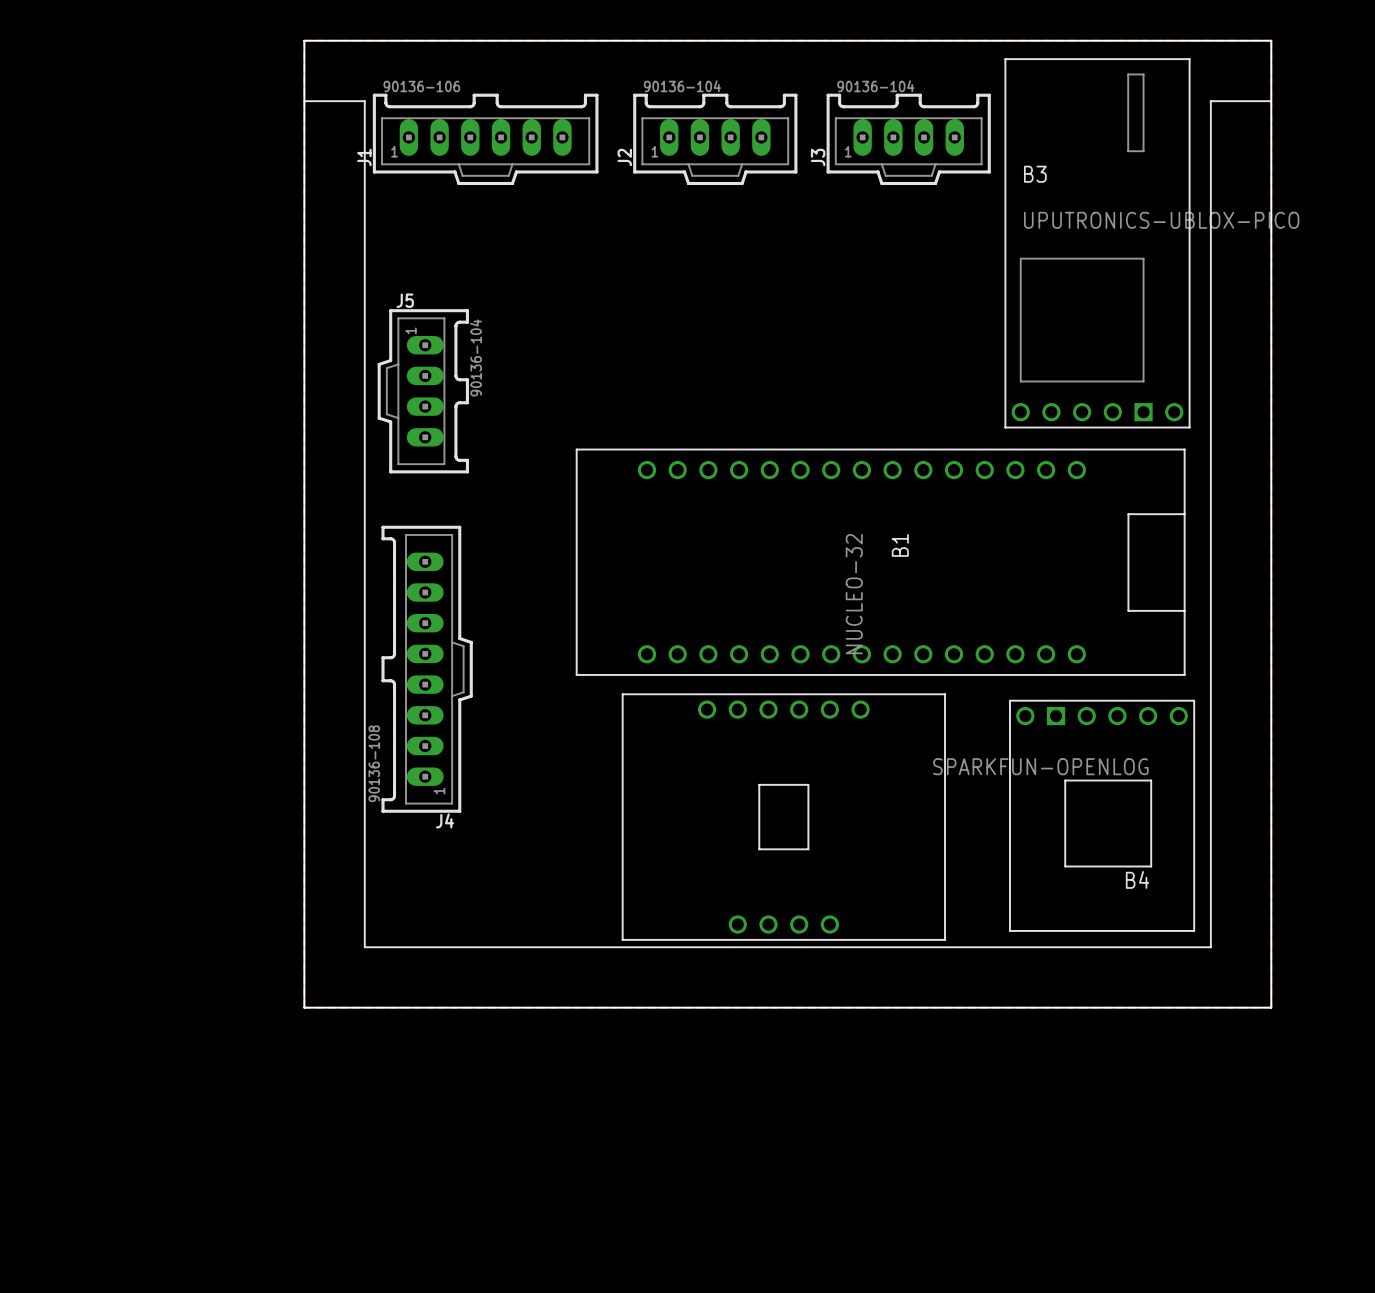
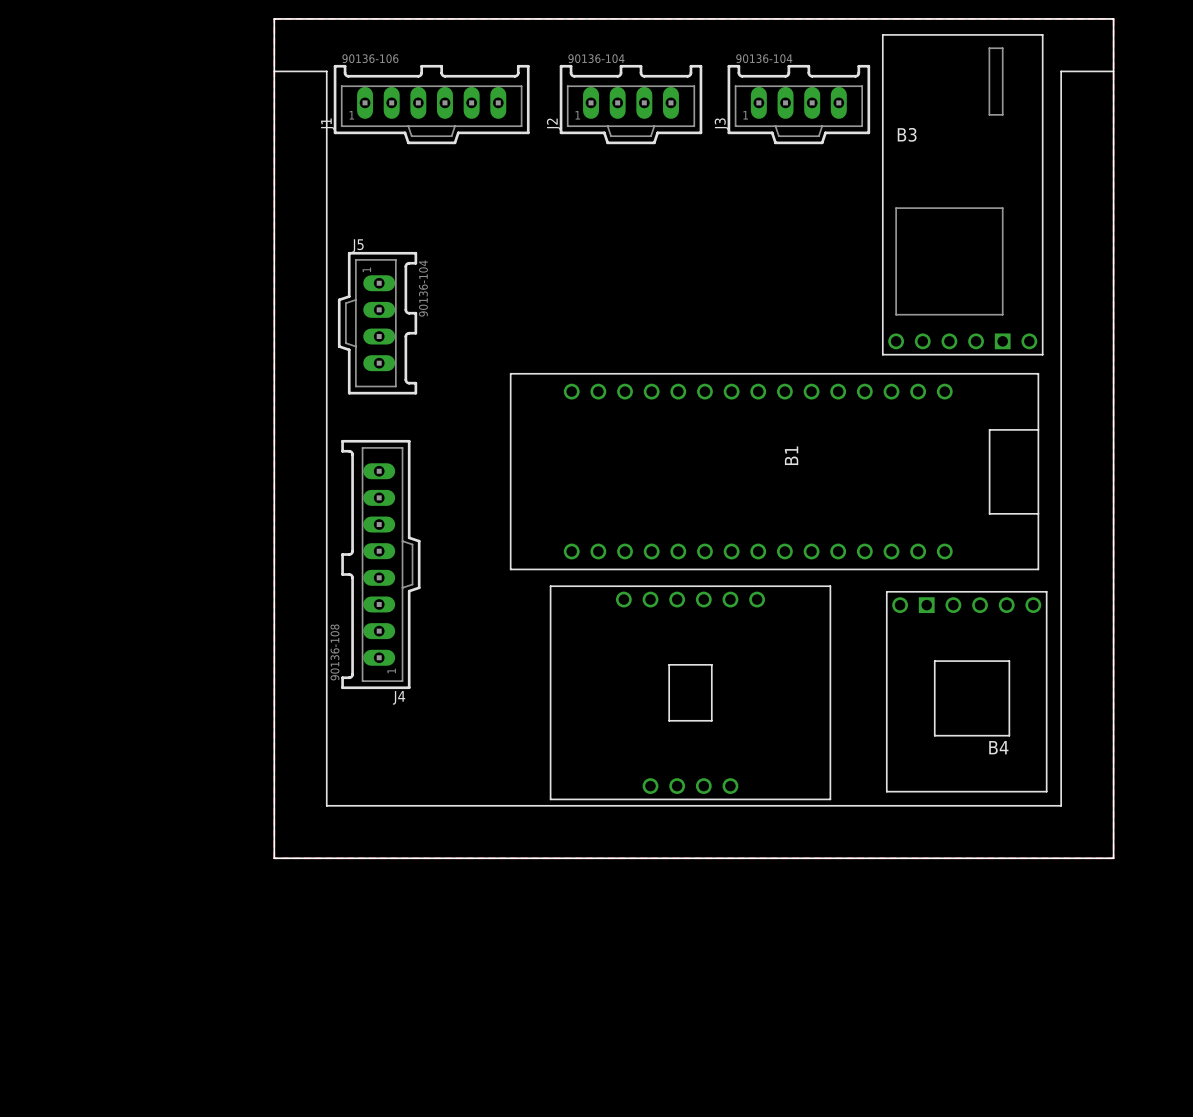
B3 value: UPUTRONICS-UBLOX-PICO (1161, 220) -> none
B1 value: NUCLEO-32 (854, 594) -> none
B4 value: SPARKFUN-OPENLOG (1040, 766) -> none

